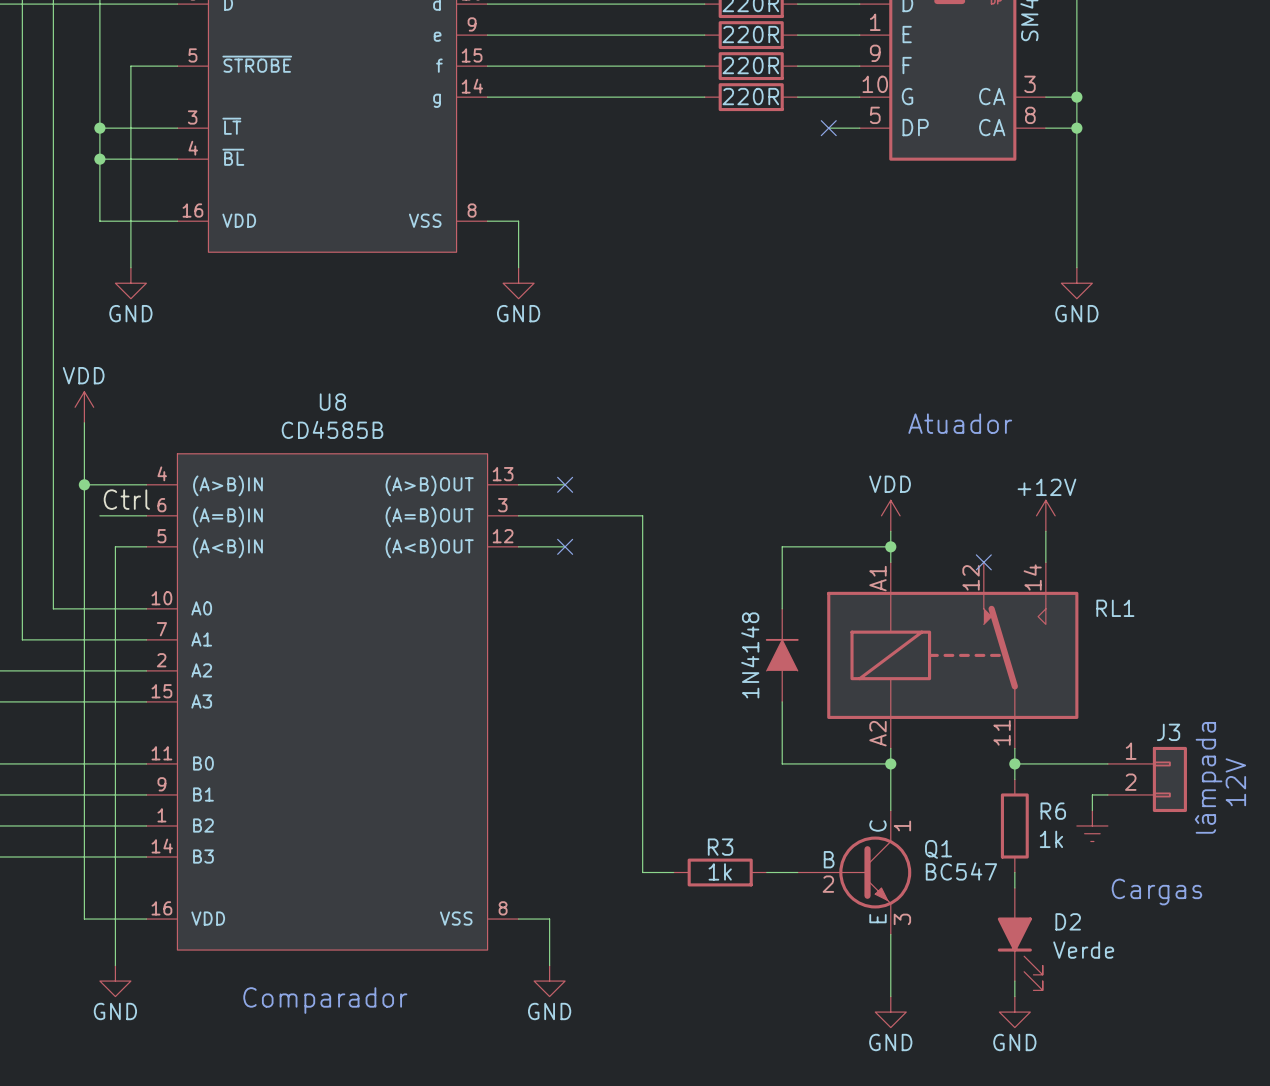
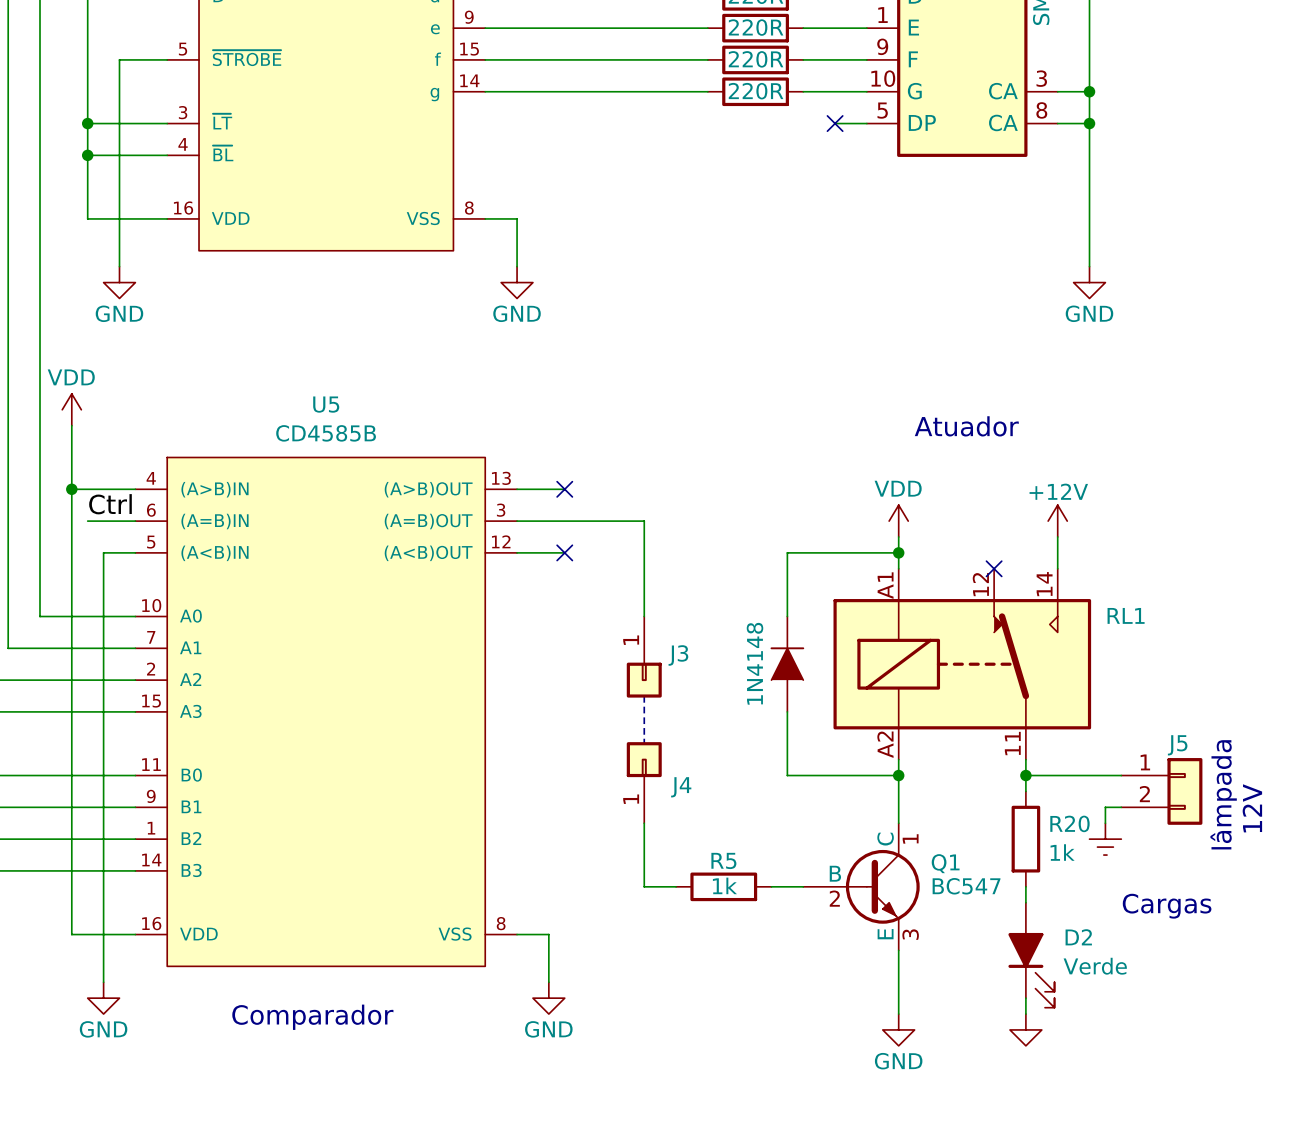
U8 name: U8 (332, 402) -> U5 (326, 404)
J3: none -> (644, 657)
line: none -> (644, 696) (644, 743)
J3 name: J3 (1168, 732) -> J5 (1177, 745)
J4: none -> (644, 782)
R6 name: R6 (1053, 811) -> R20 (1069, 823)
R3 name: R3 (720, 847) -> R5 (723, 860)
power symbol text: GND (1014, 1042) -> none

